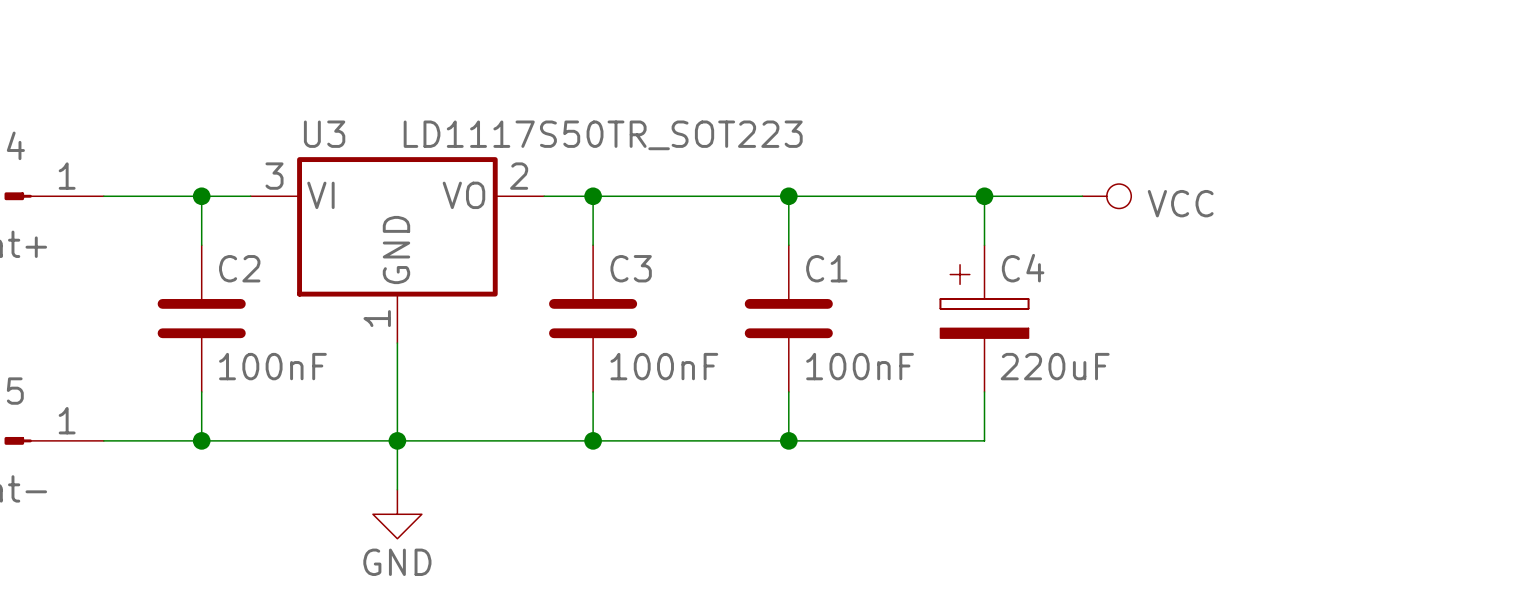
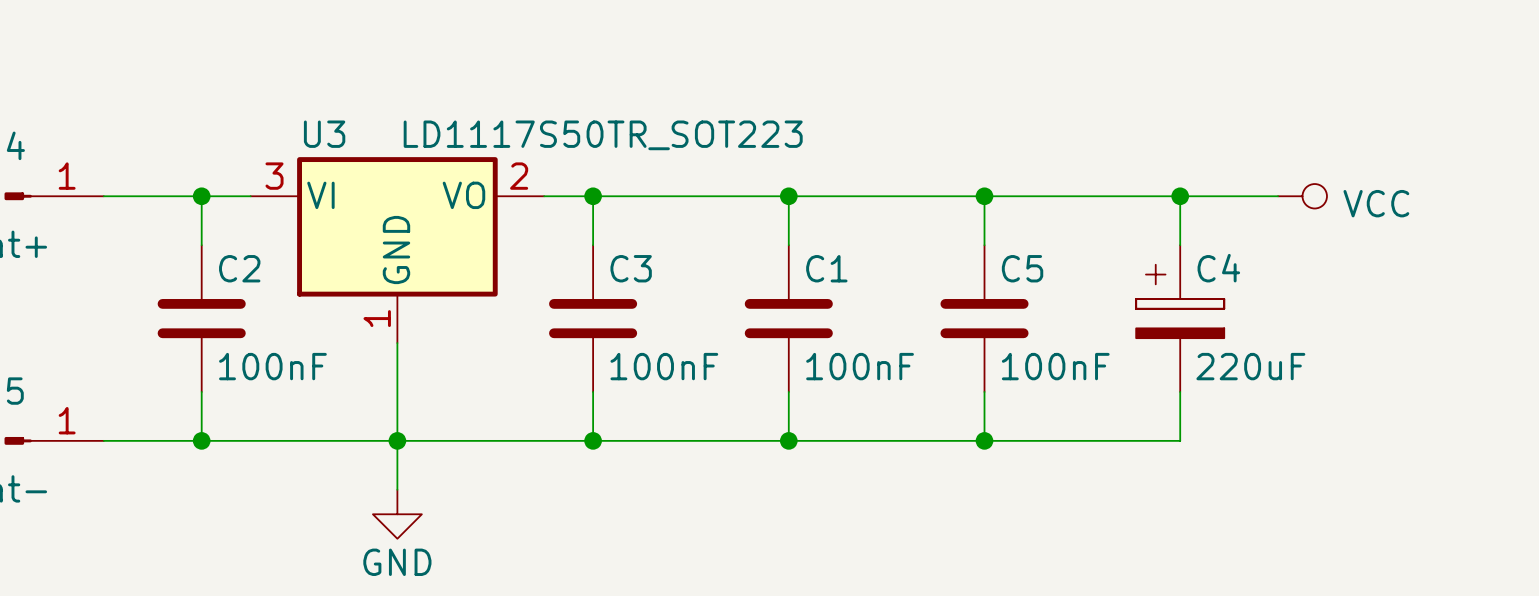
wire: none -> (1082, 196) (1278, 196)
power symbol position: VCC (1106, 196) -> VCC (1302, 196)
wire: none -> (1180, 196) (1180, 245)
junction: none -> (1180, 196)
C4 position: (984, 318) -> (1180, 318)
C5: none -> 100nF (984, 318)
wire: none -> (1180, 391) (1180, 440) (984, 440)
junction: none -> (984, 440)

